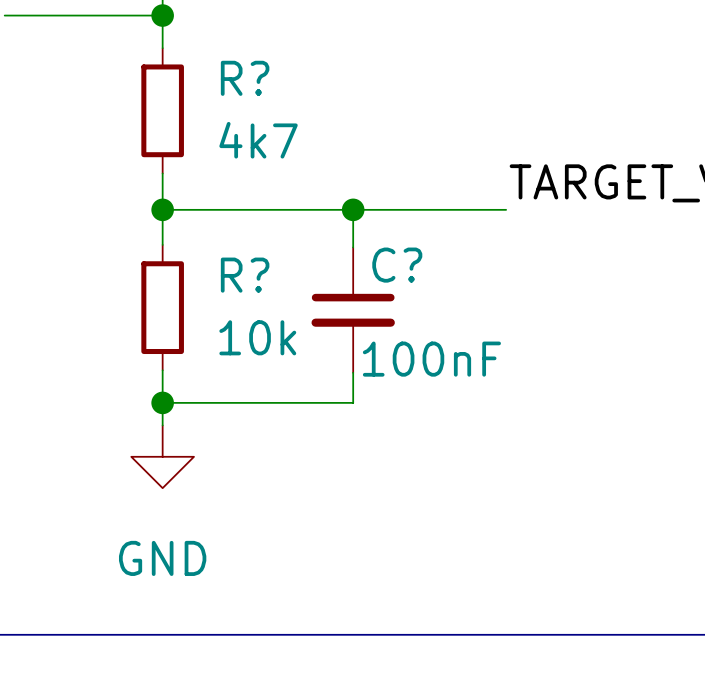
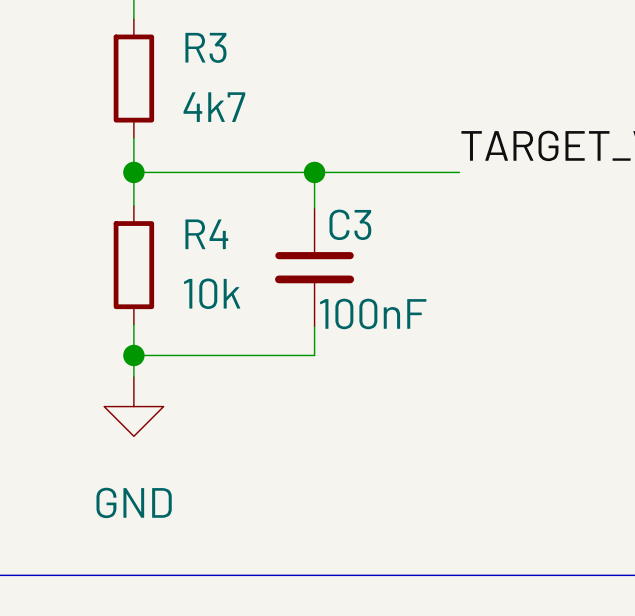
R? name: R? (245, 78) -> R3 (205, 47)
C? name: C? (397, 265) -> C3 (350, 224)
R? name: R? (245, 275) -> R4 (206, 234)

